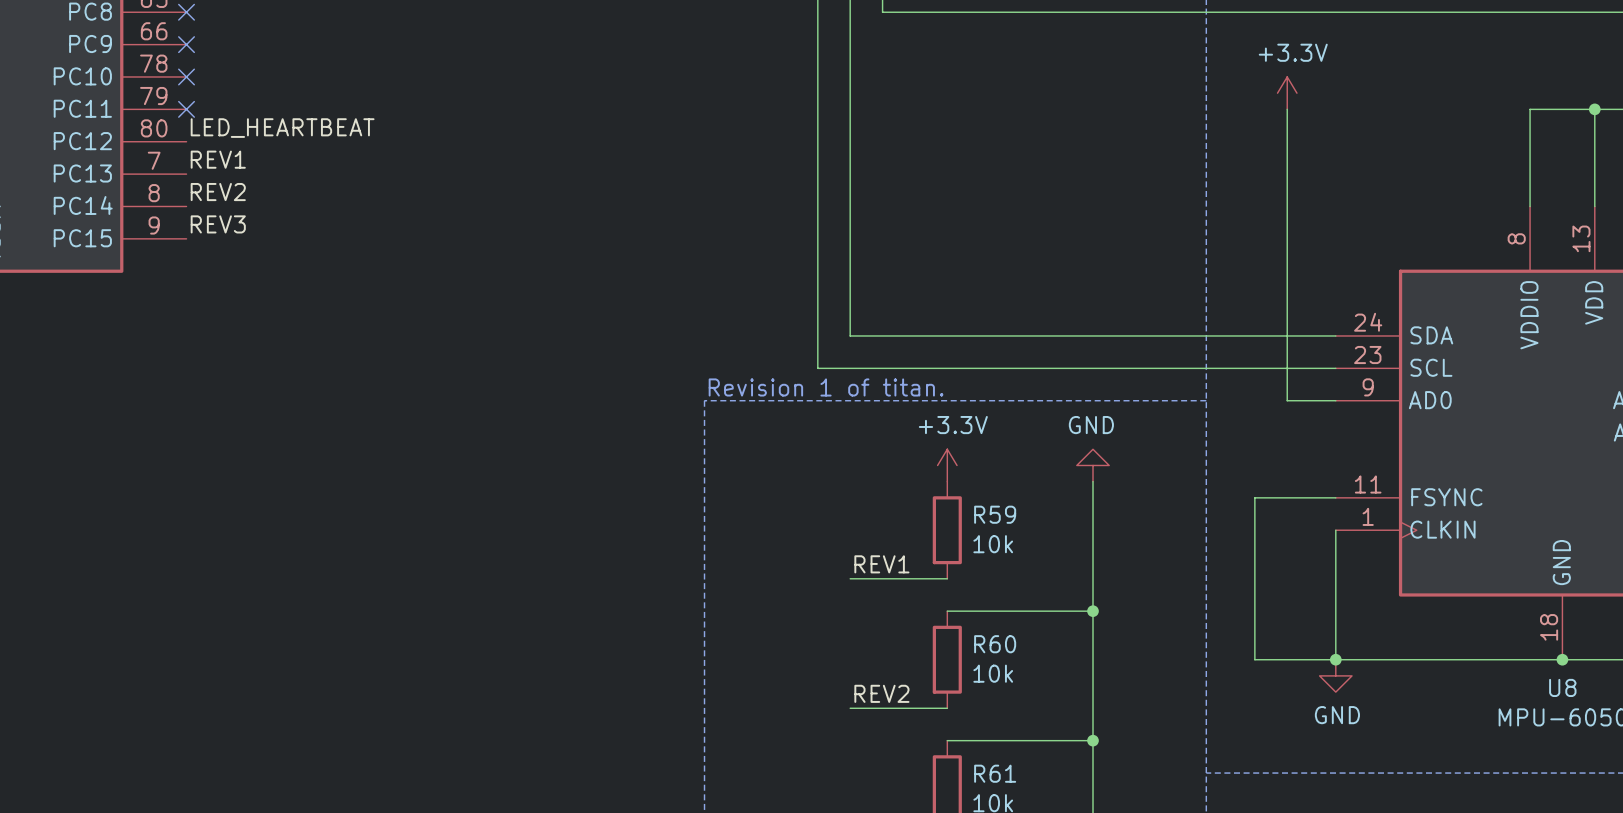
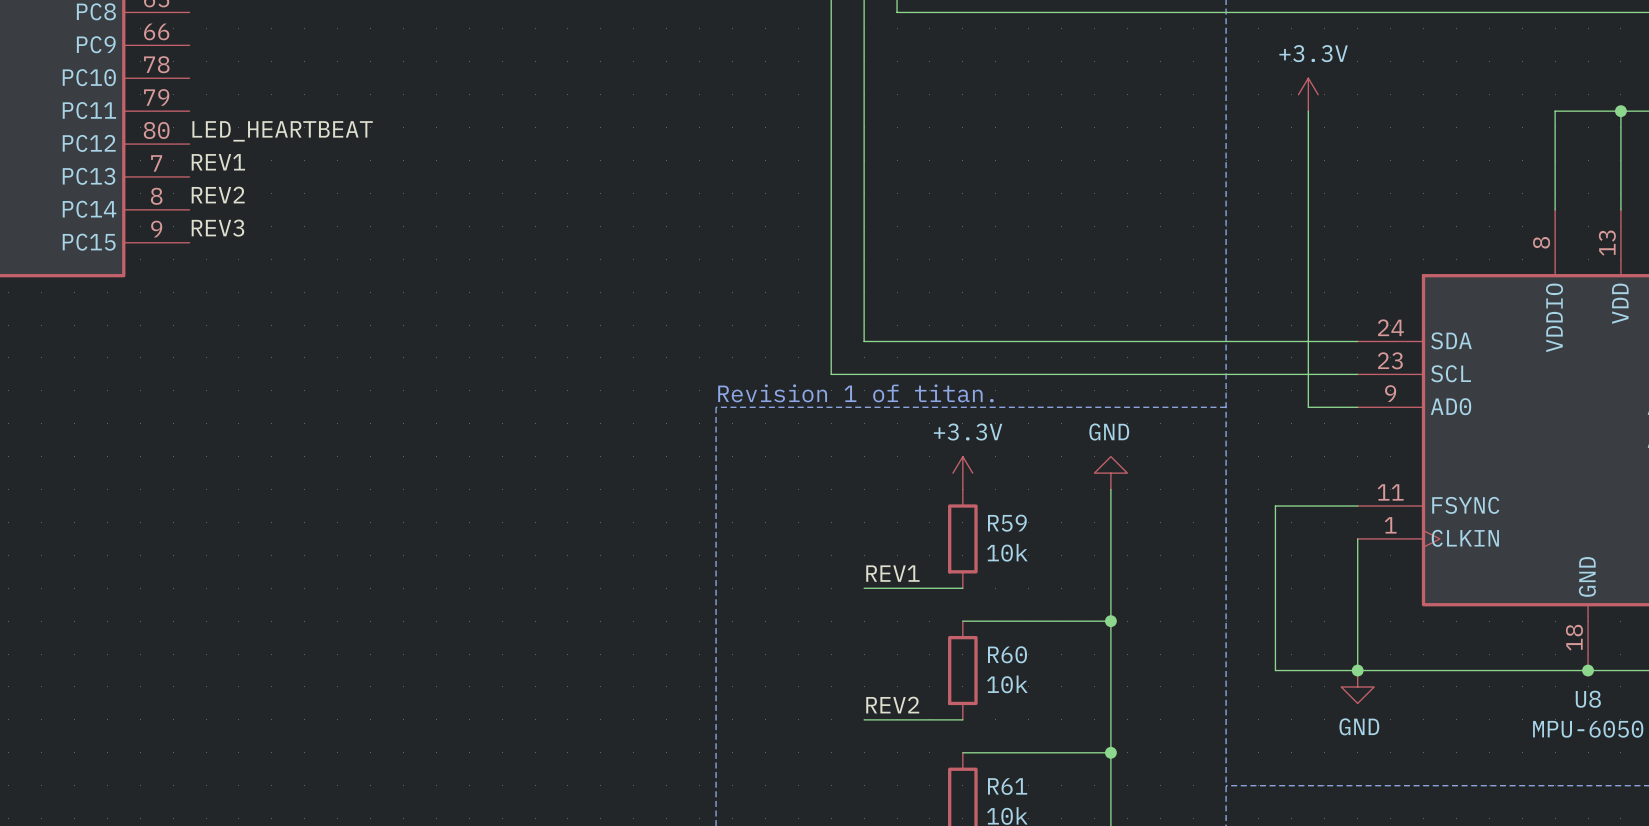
no-connect mark: (186, 12) -> none
no-connect mark: (186, 44) -> none
no-connect mark: (186, 76) -> none
no-connect mark: (186, 109) -> none

